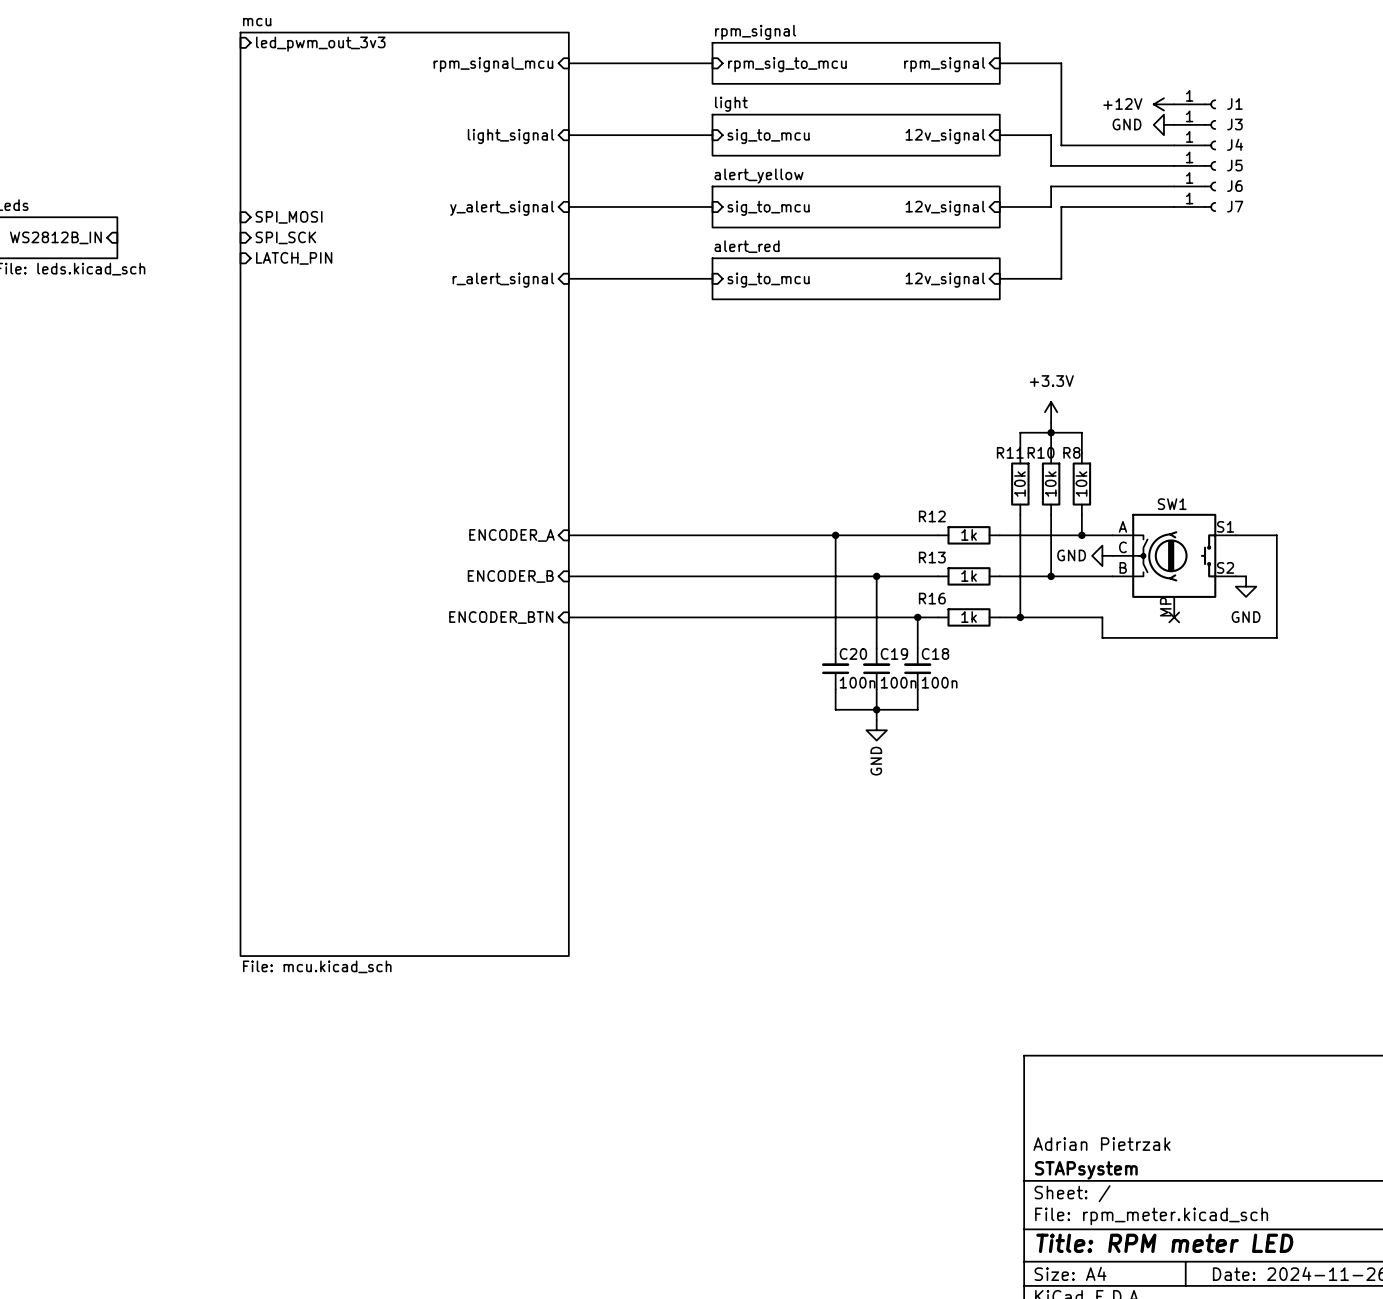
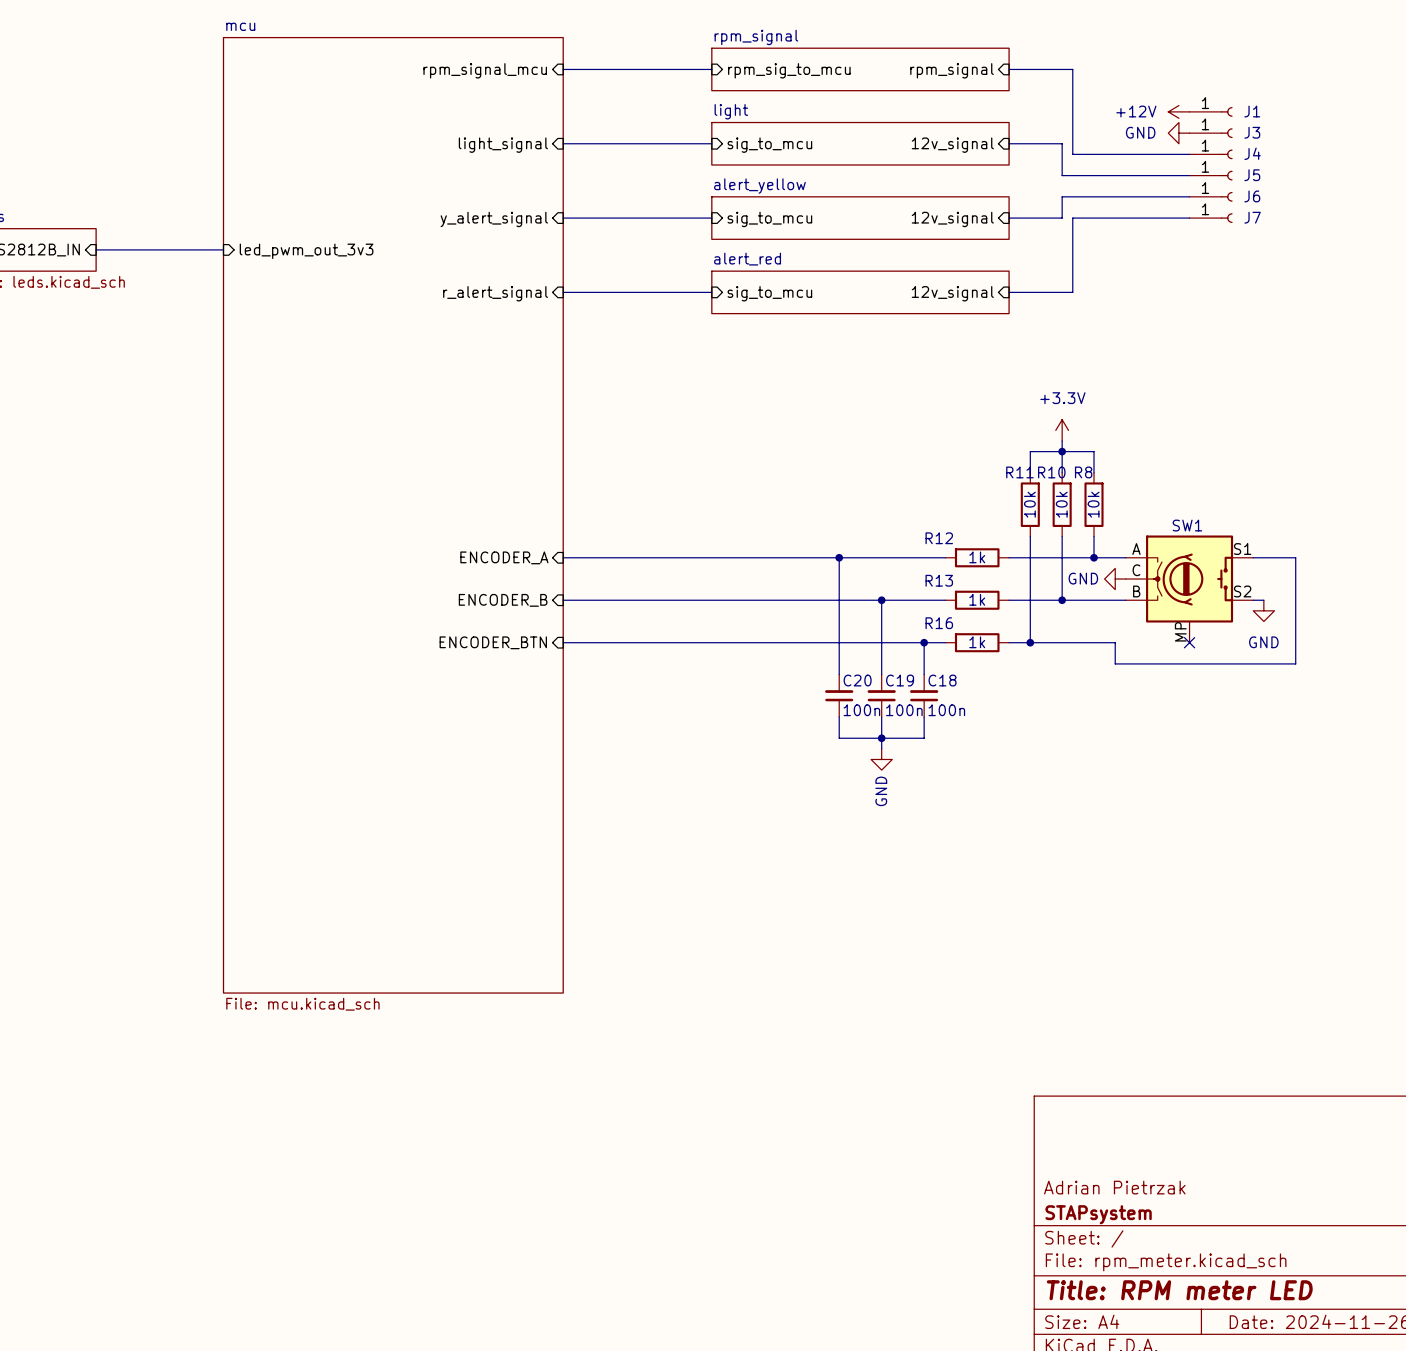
sheet pin: led_pwm_out_3v3 (320, 44) -> none
sheet pin: SPI_MOSI (289, 217) -> none
wire: none -> (96, 249) (223, 249)
sheet pin: SPI_SCK (285, 237) -> led_pwm_out_3v3 (306, 251)
sheet pin: LATCH_PIN (294, 258) -> none

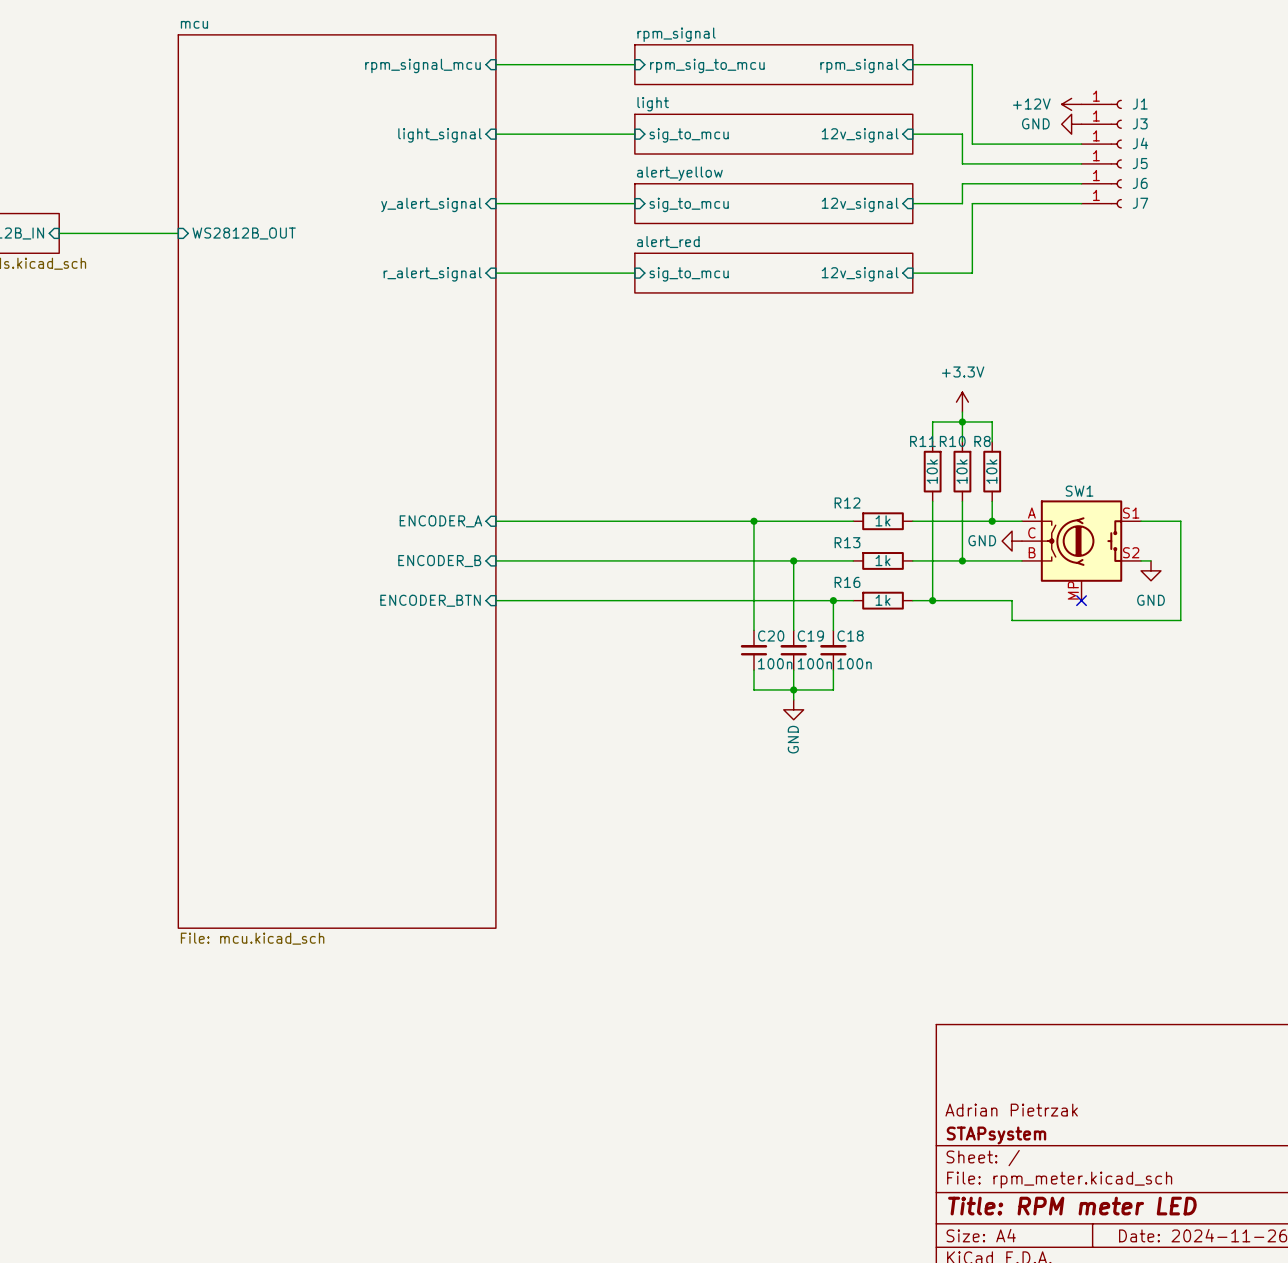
sheet pin: led_pwm_out_3v3 (306, 251) -> WS2812B_OUT (244, 233)

